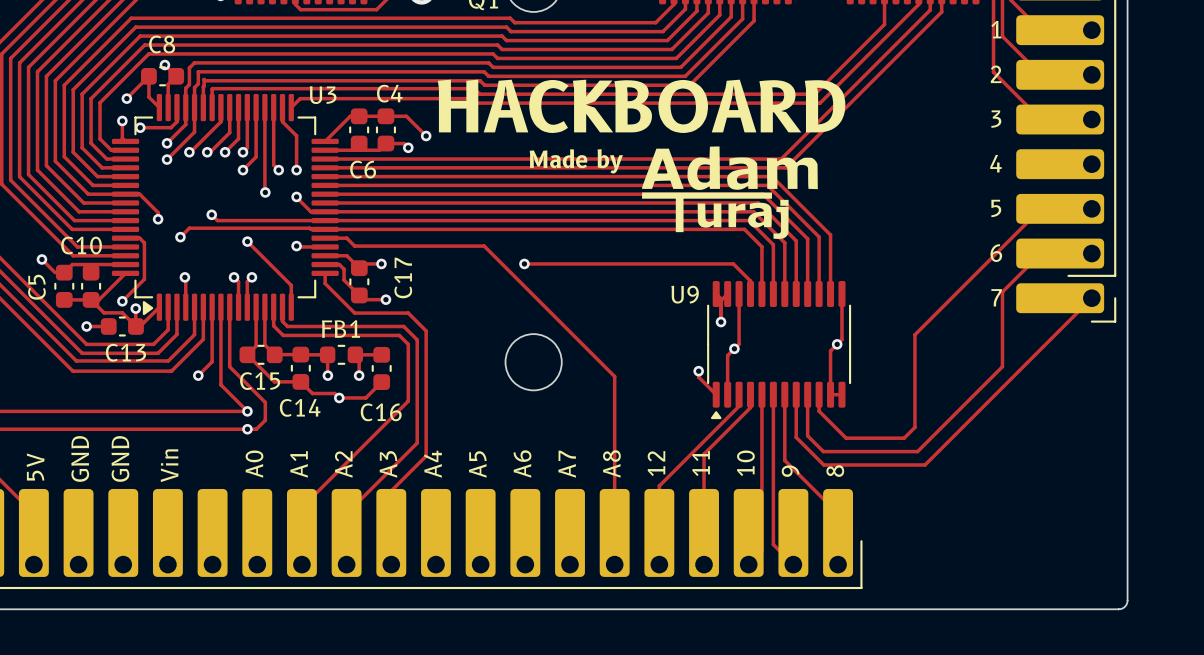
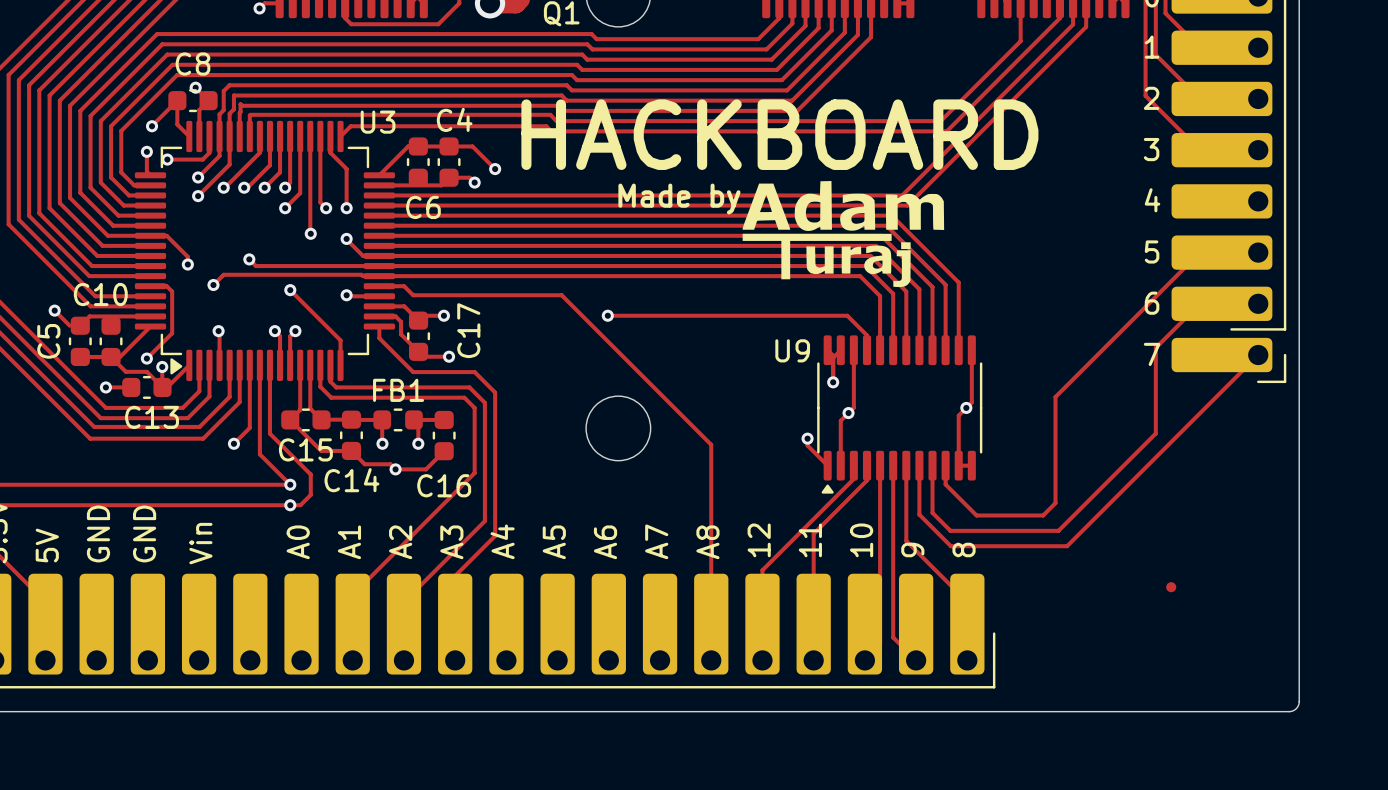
part: none -> (1171, 587)

